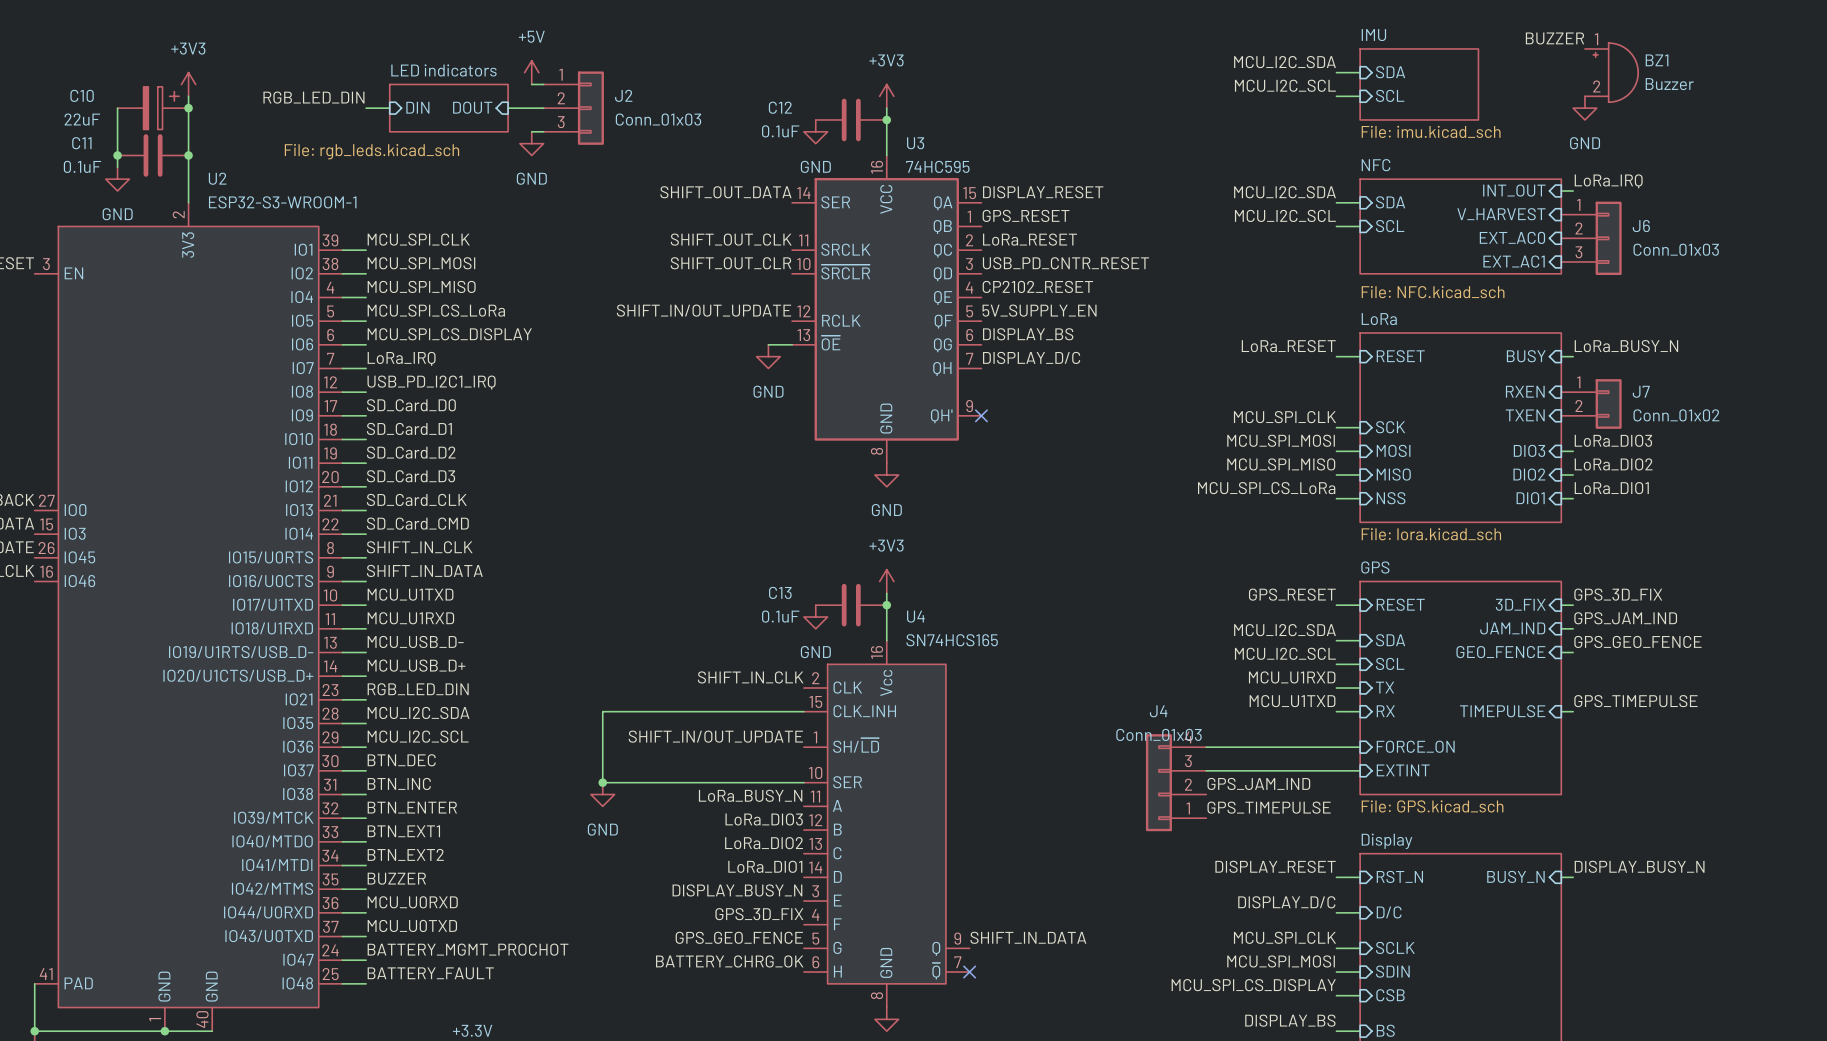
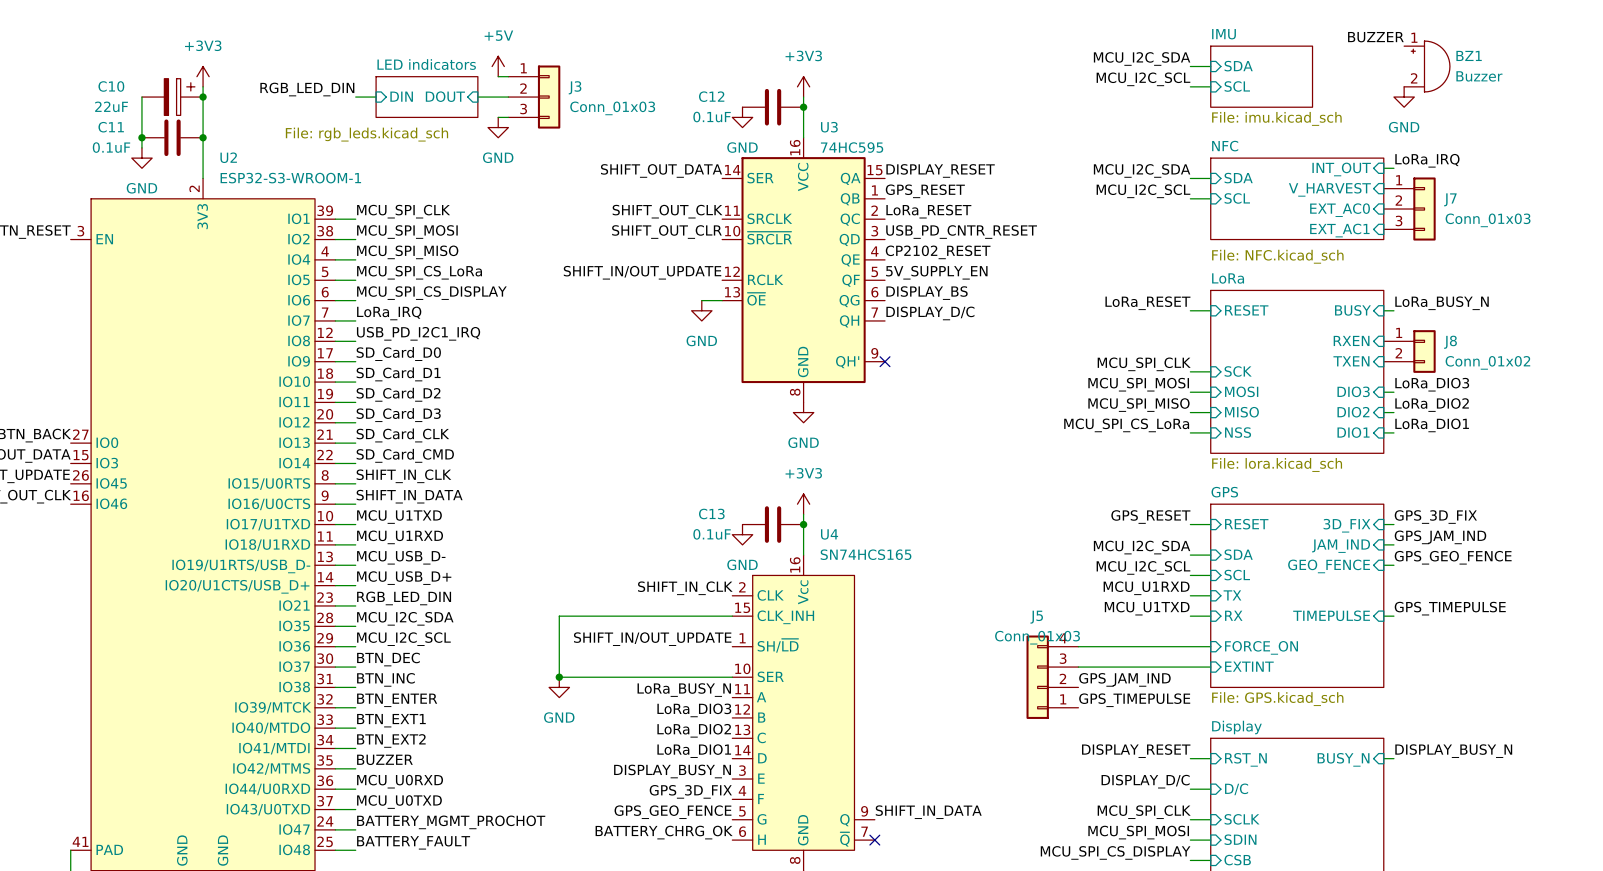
J2 name: J2 (623, 95) -> J3 (575, 87)
J6 name: J6 (1641, 226) -> J7 (1450, 199)
J7 name: J7 (1641, 391) -> J8 (1450, 342)
J4 name: J4 (1158, 711) -> J5 (1036, 617)

